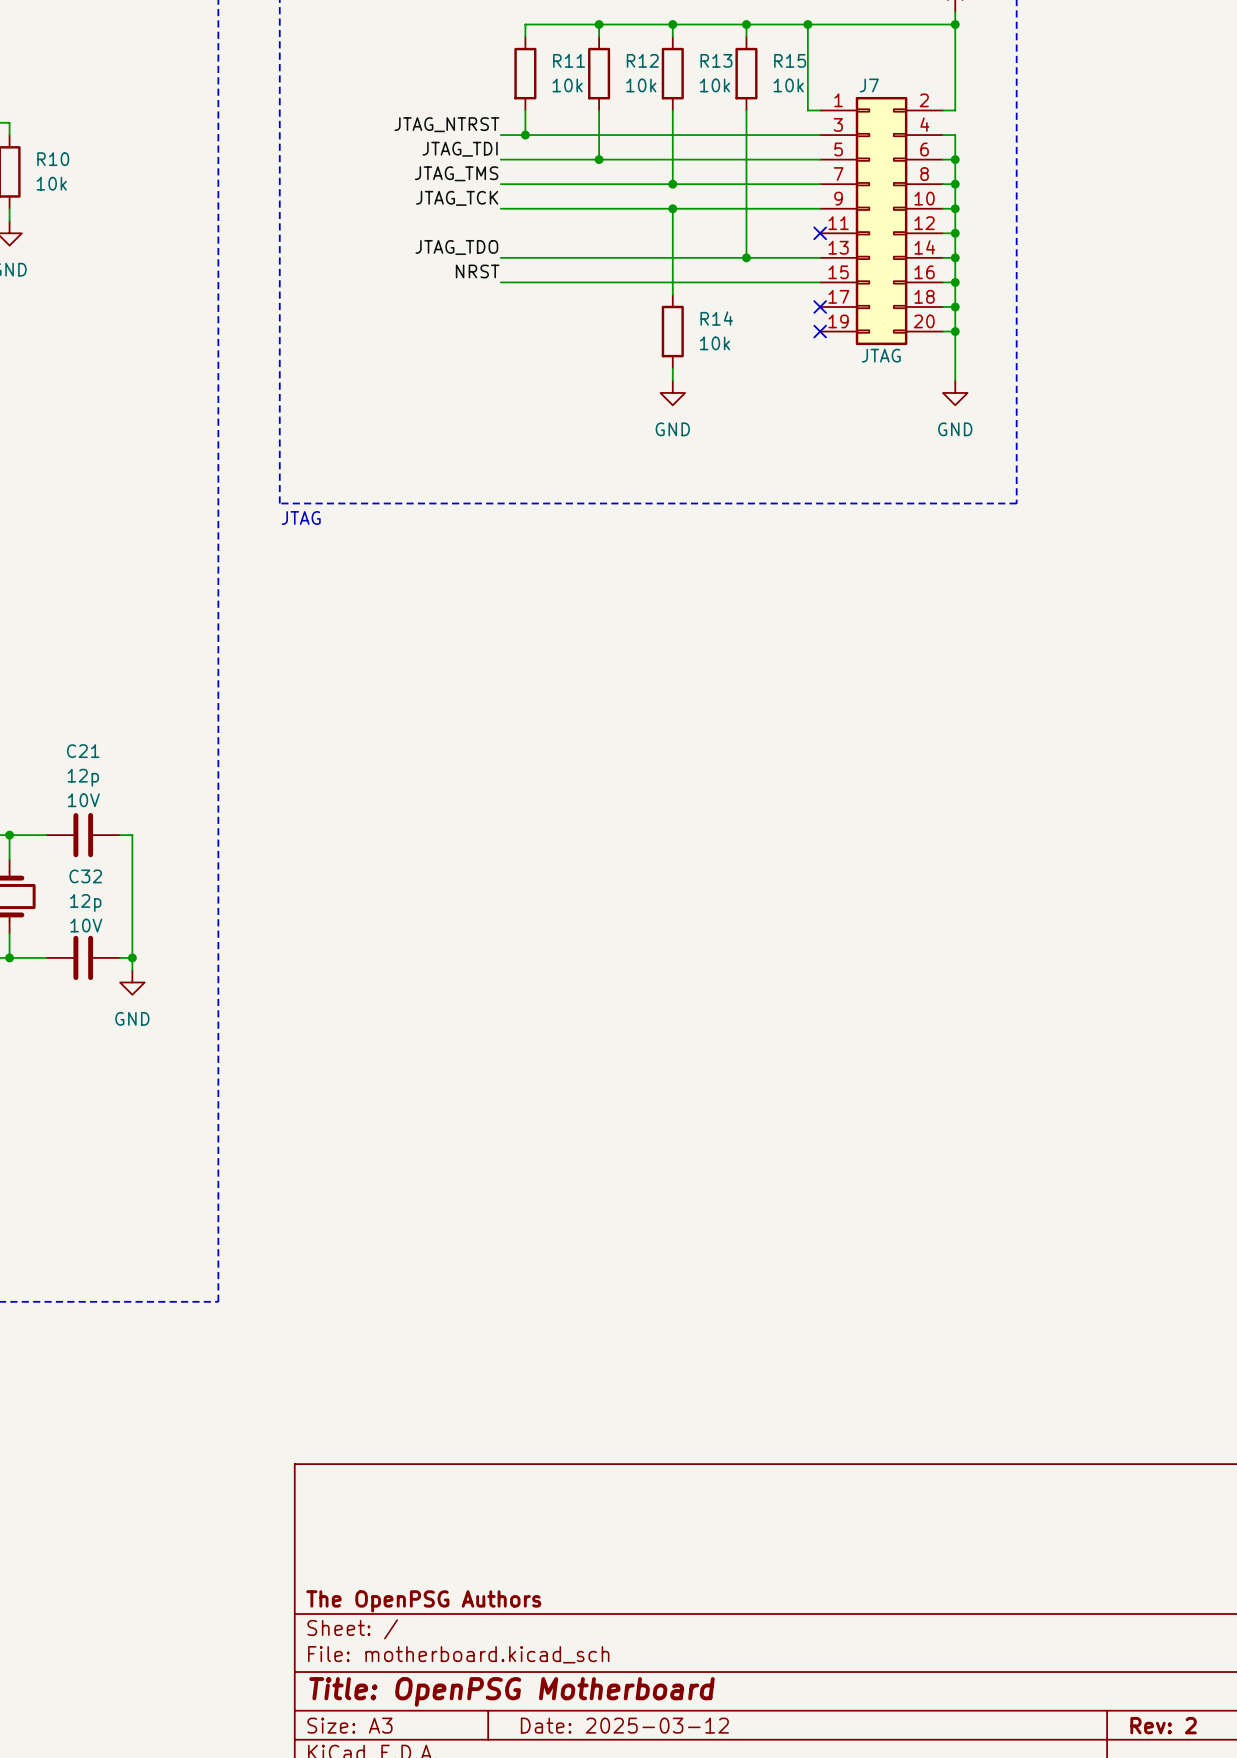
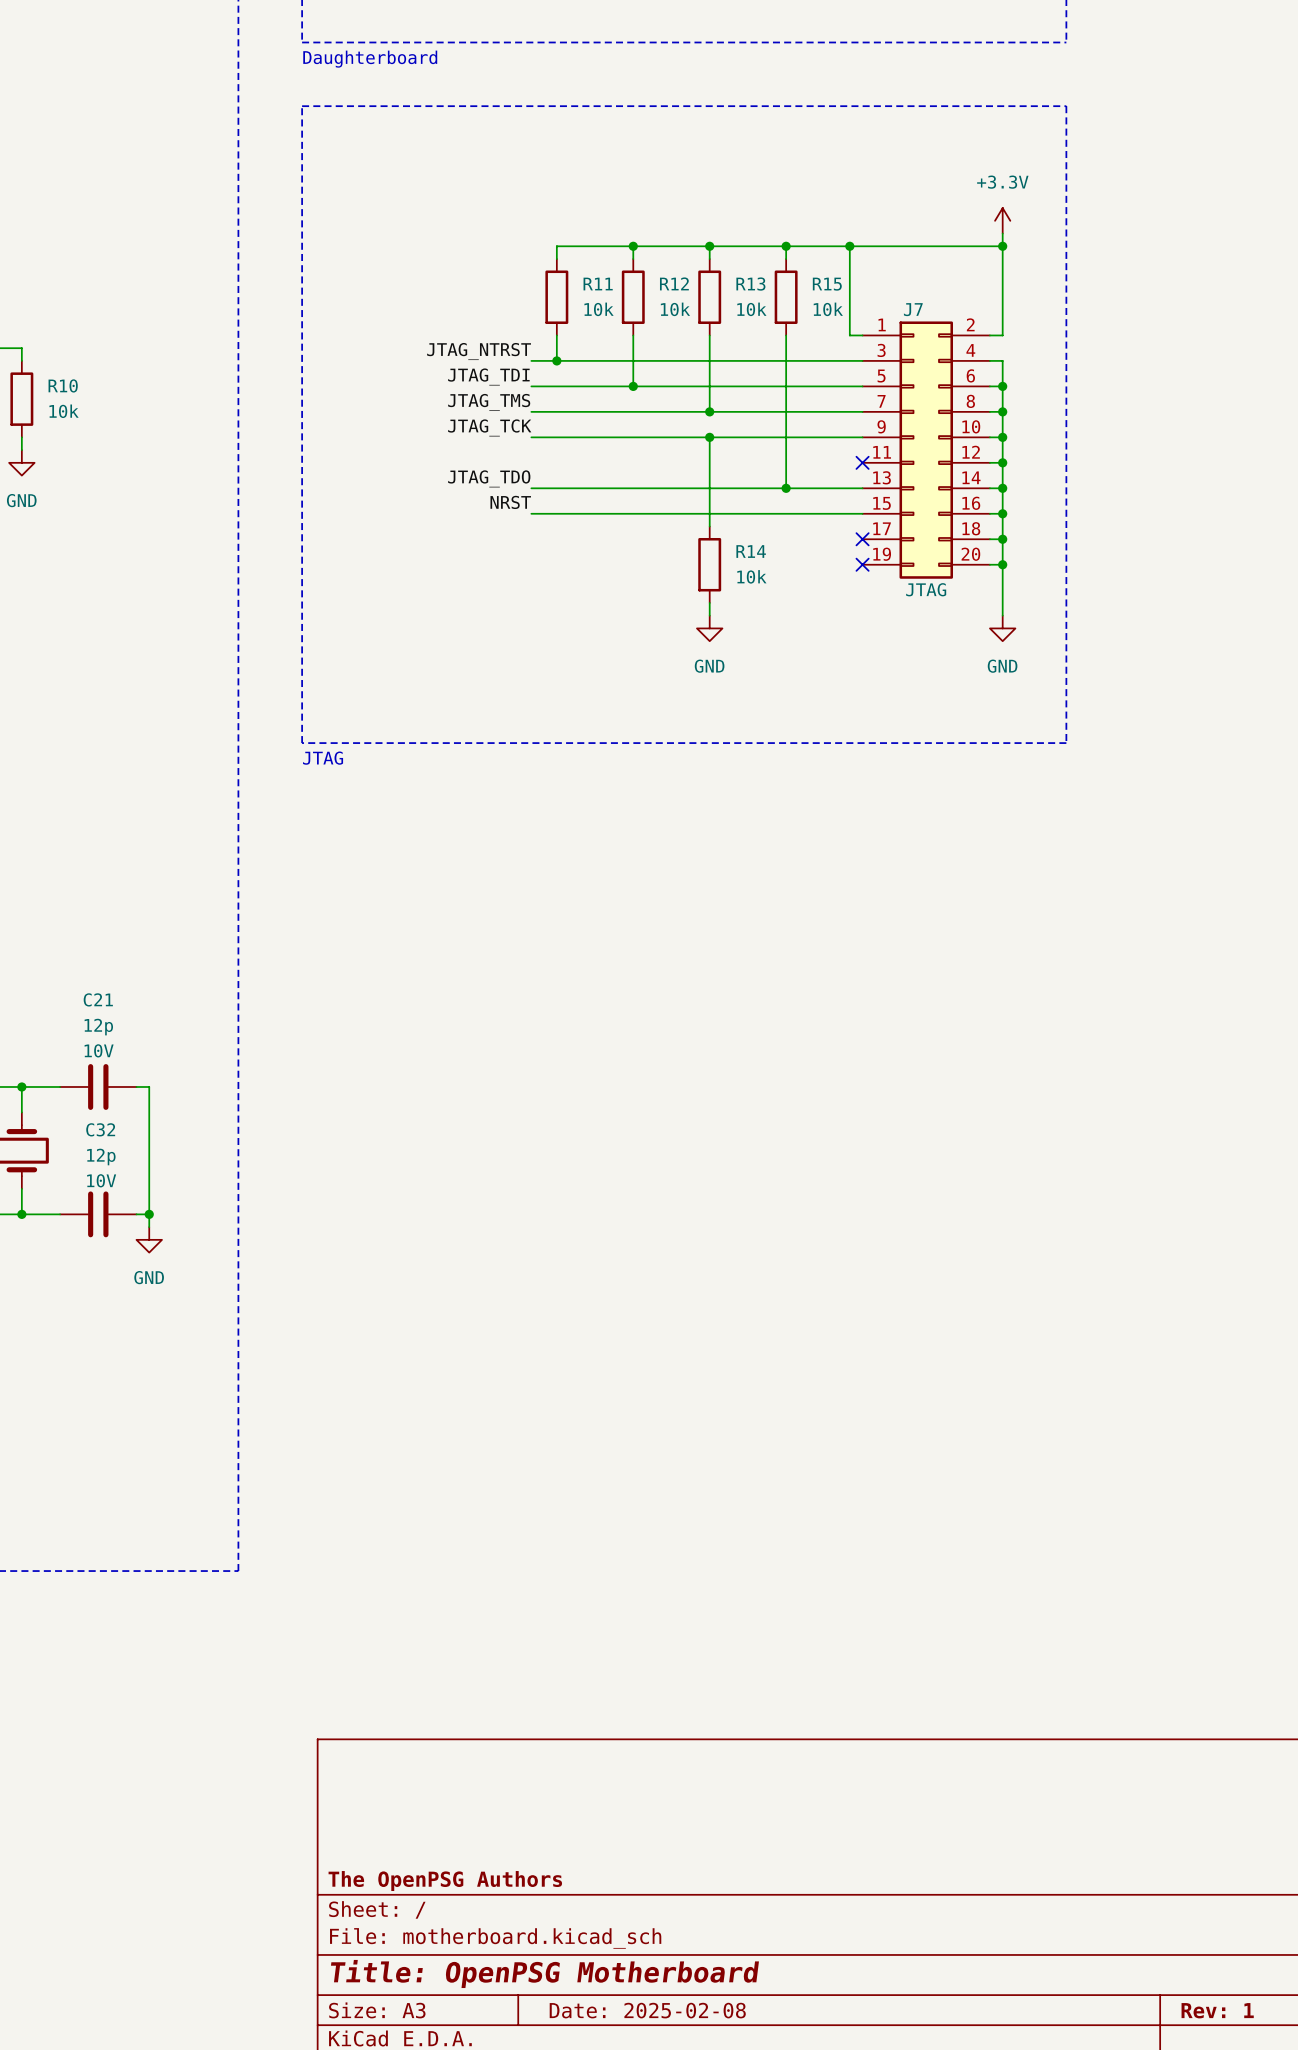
title block: Date: 2025-03-12 (624, 1725) -> Date: 2025-02-08 (647, 2010)
title block: Rev: 2 (1163, 1725) -> Rev: 1 (1217, 2010)

